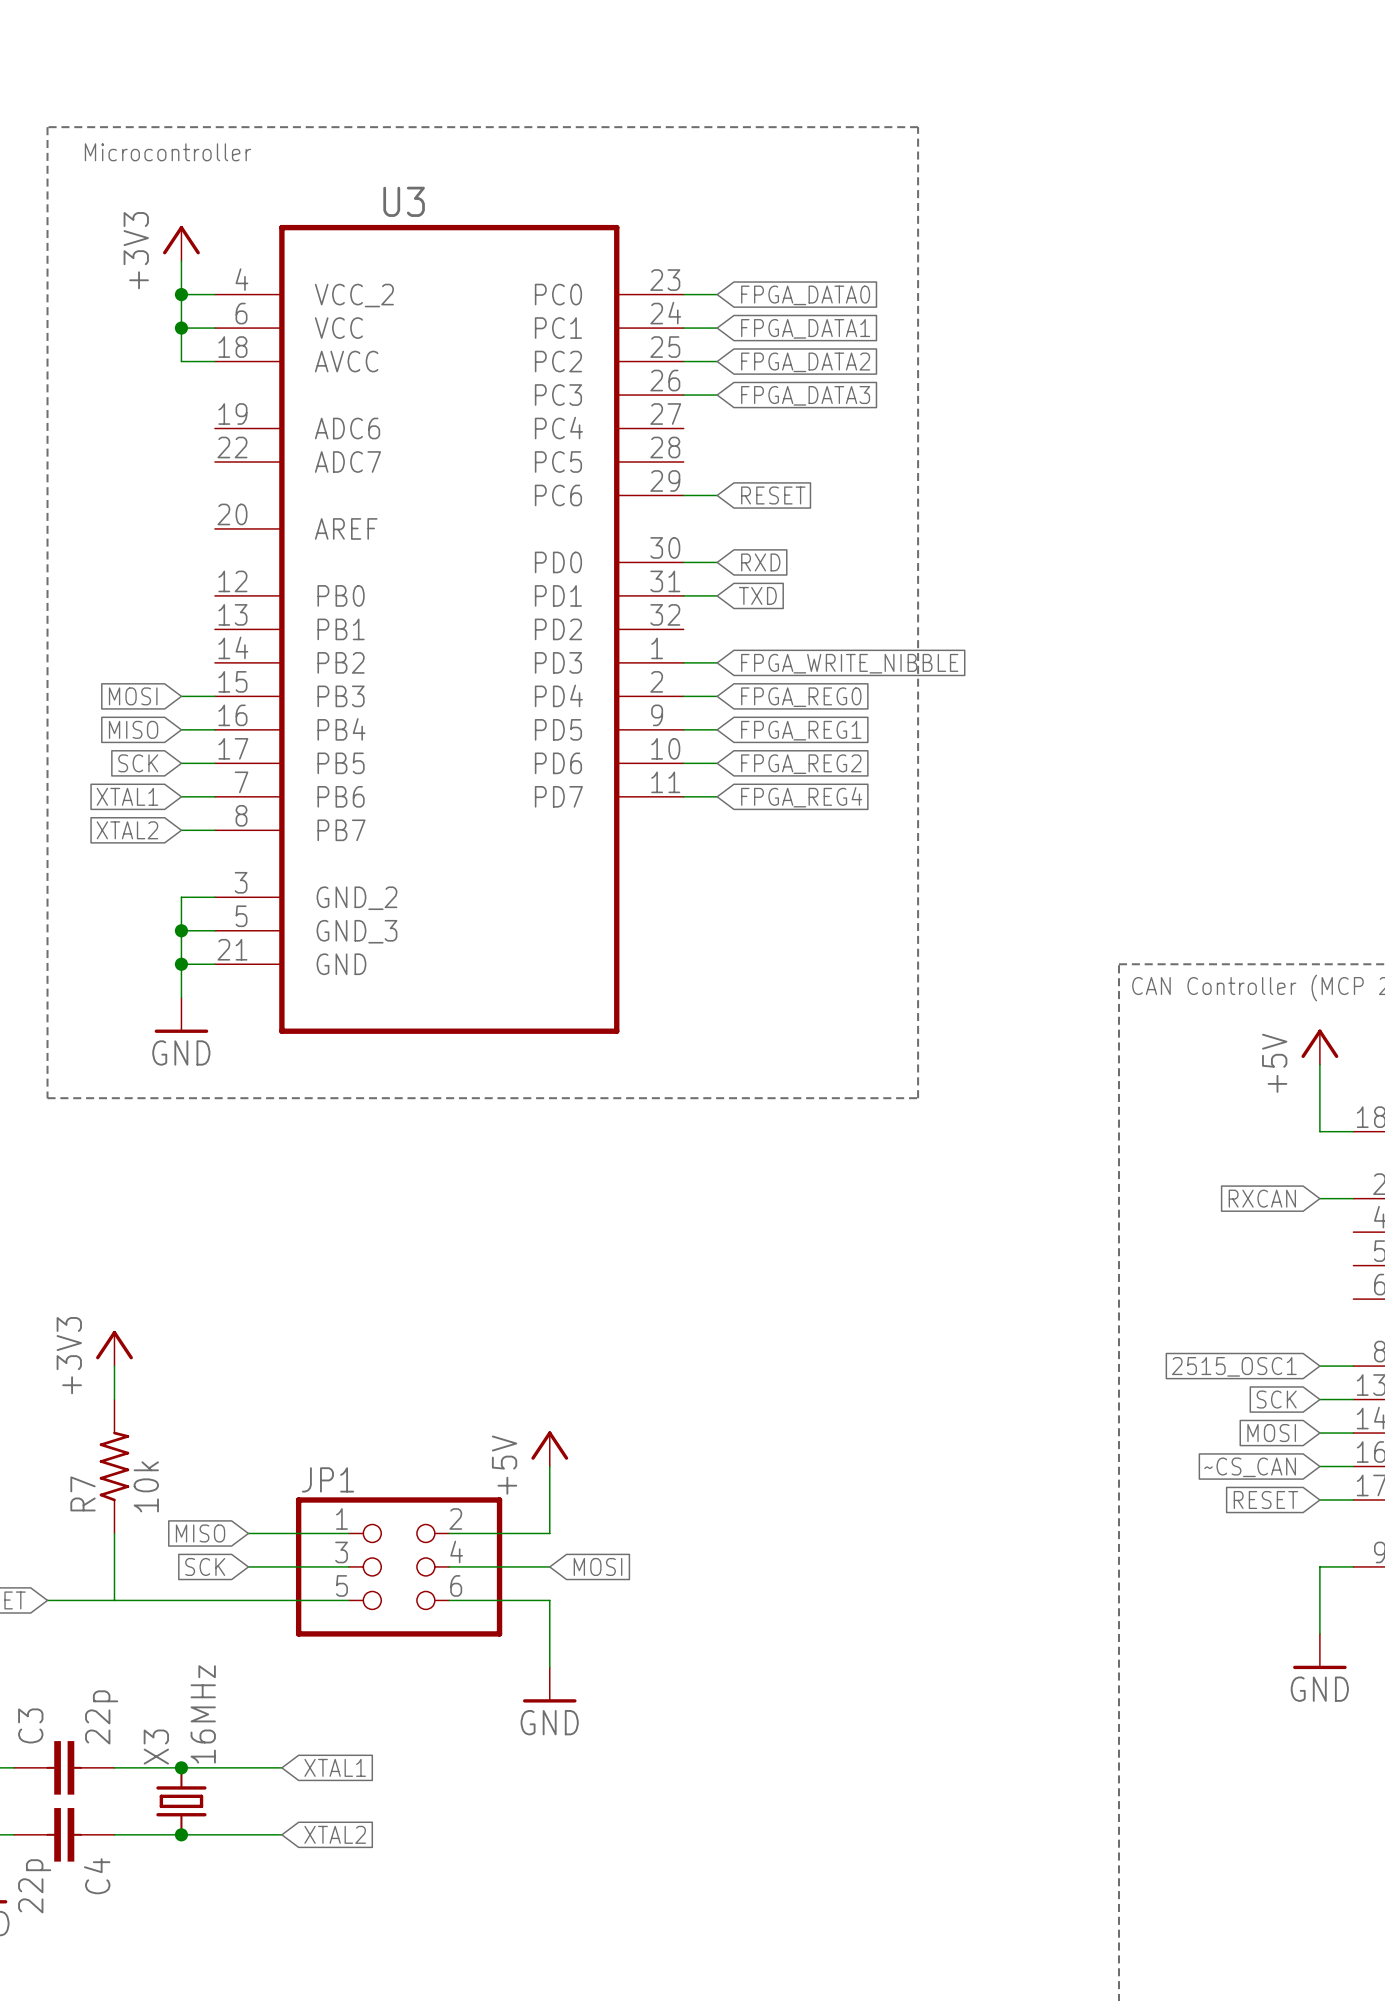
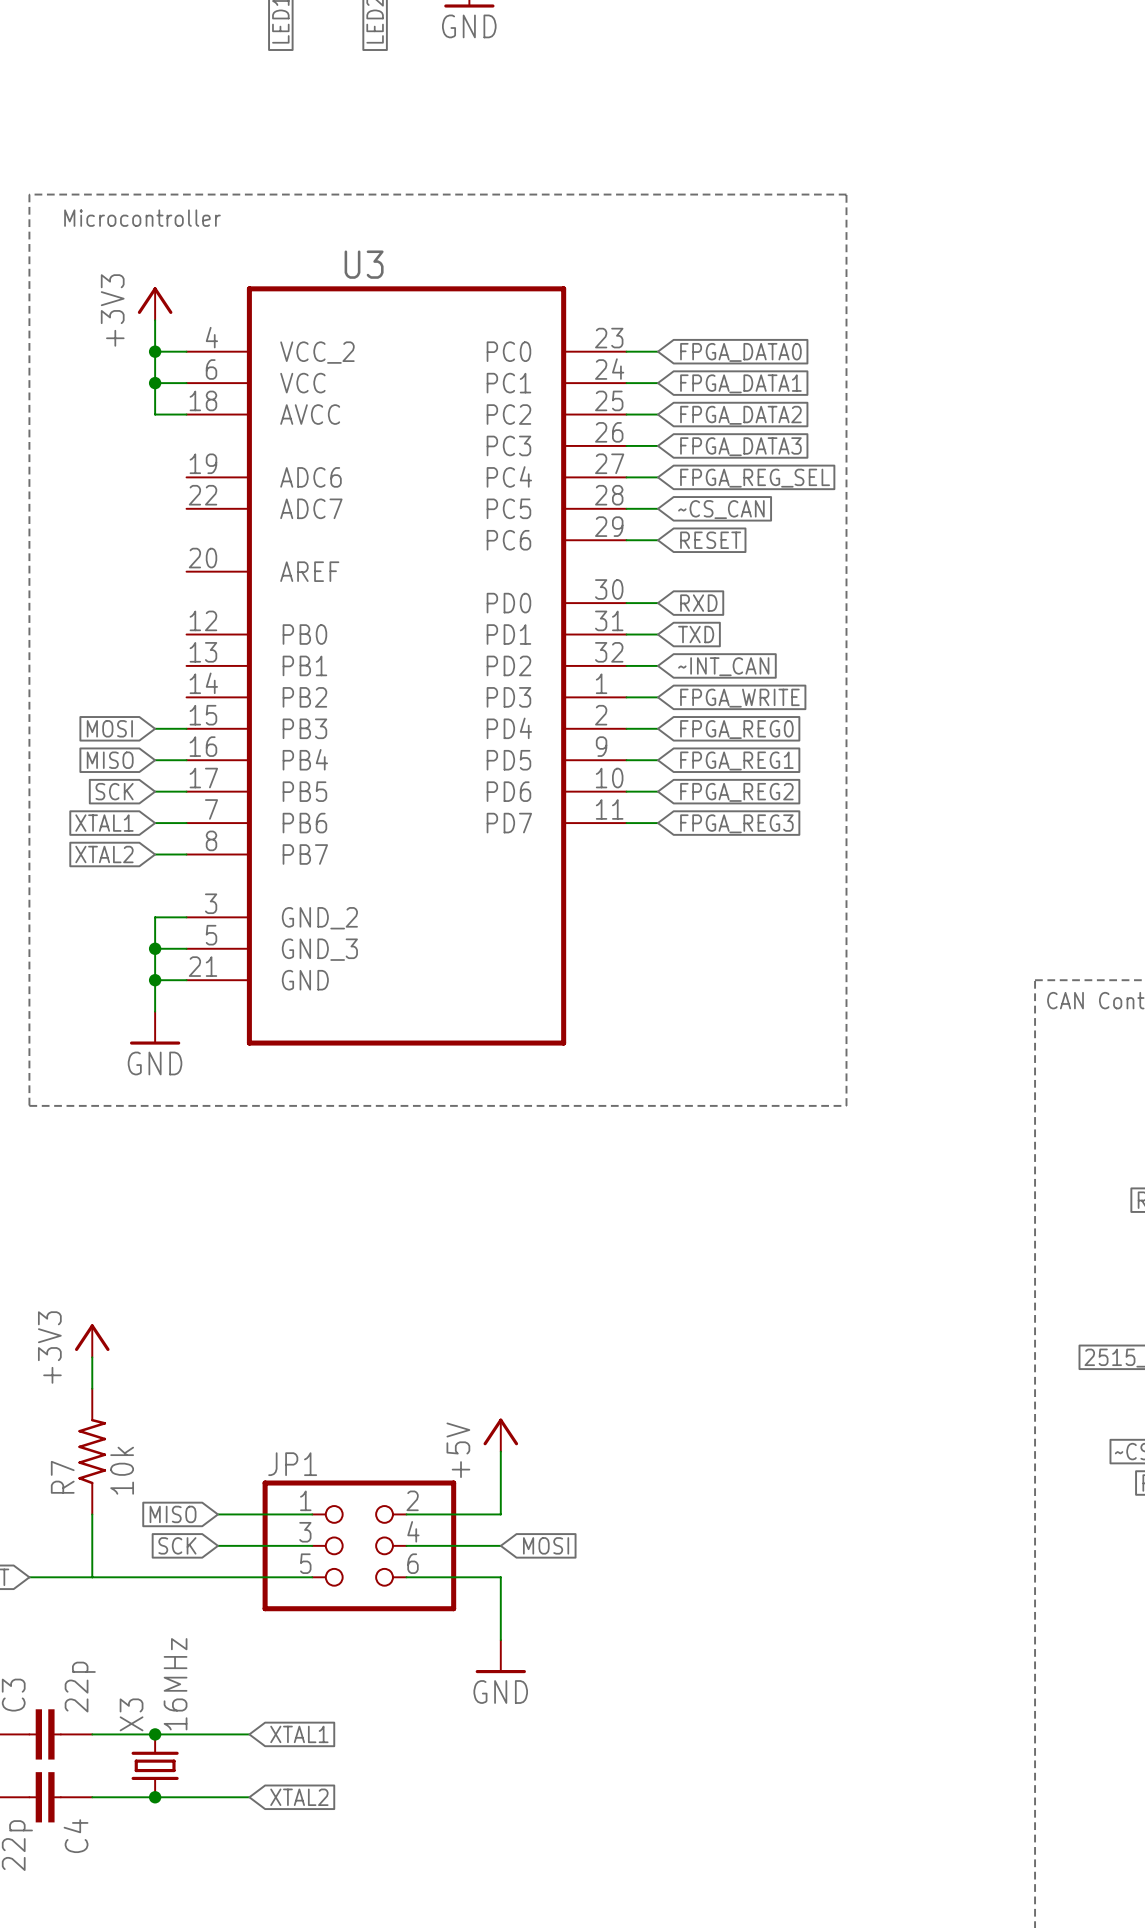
wire: none -> (626, 477) (657, 477)
global label: none -> FPGA_REG_SEL (755, 478)
wire: none -> (626, 508) (657, 508)
global label: none -> ~CS_CAN (721, 509)
wire: none -> (626, 665) (657, 665)
global label: none -> ~INT_CAN (723, 666)
global label: FPGA_WRITE_NIBBLE (849, 663) -> FPGA_WRITE (739, 698)
global label: FPGA_REG4 (801, 797) -> FPGA_REG3 (736, 823)

